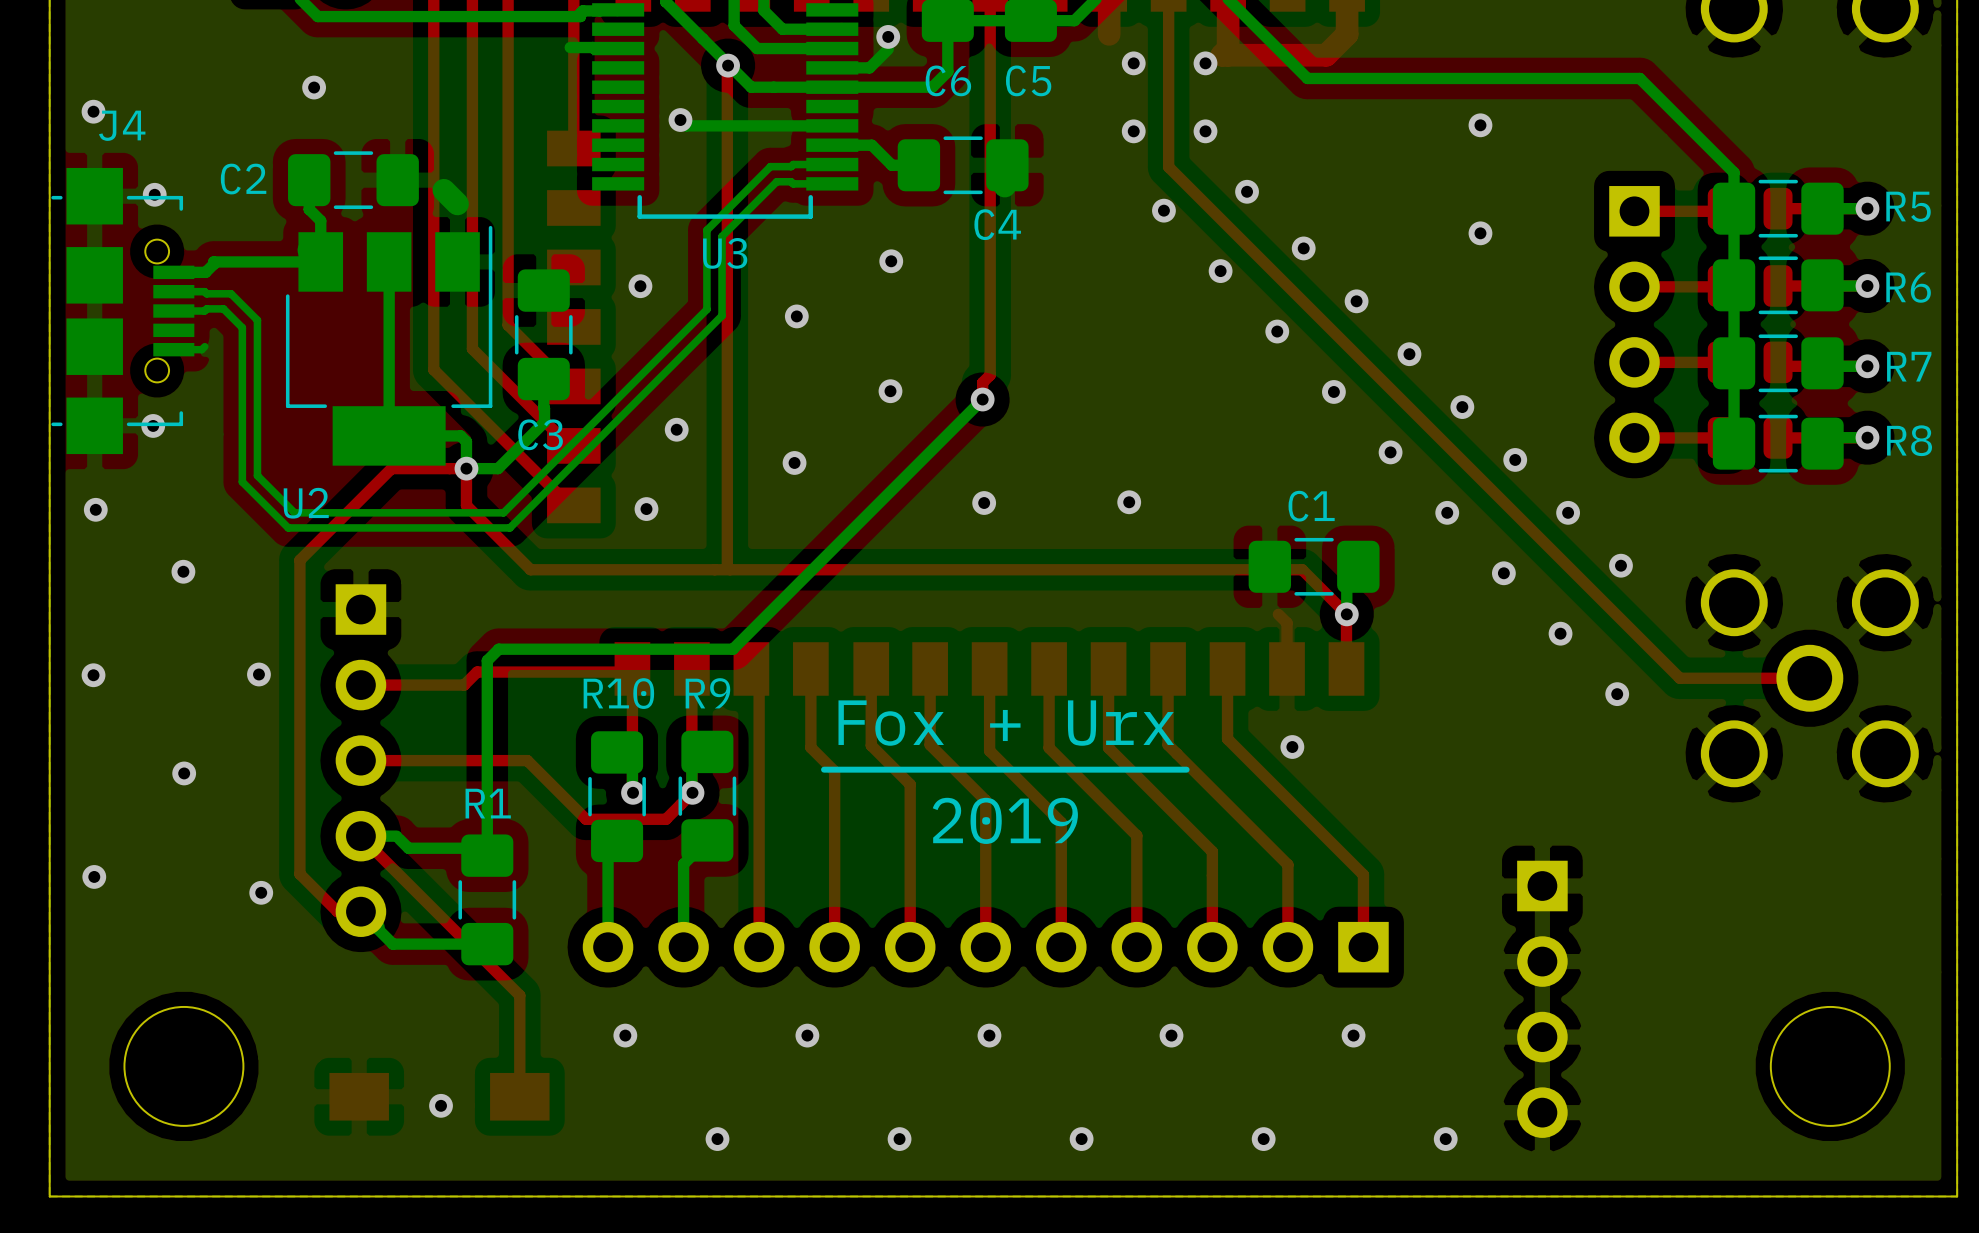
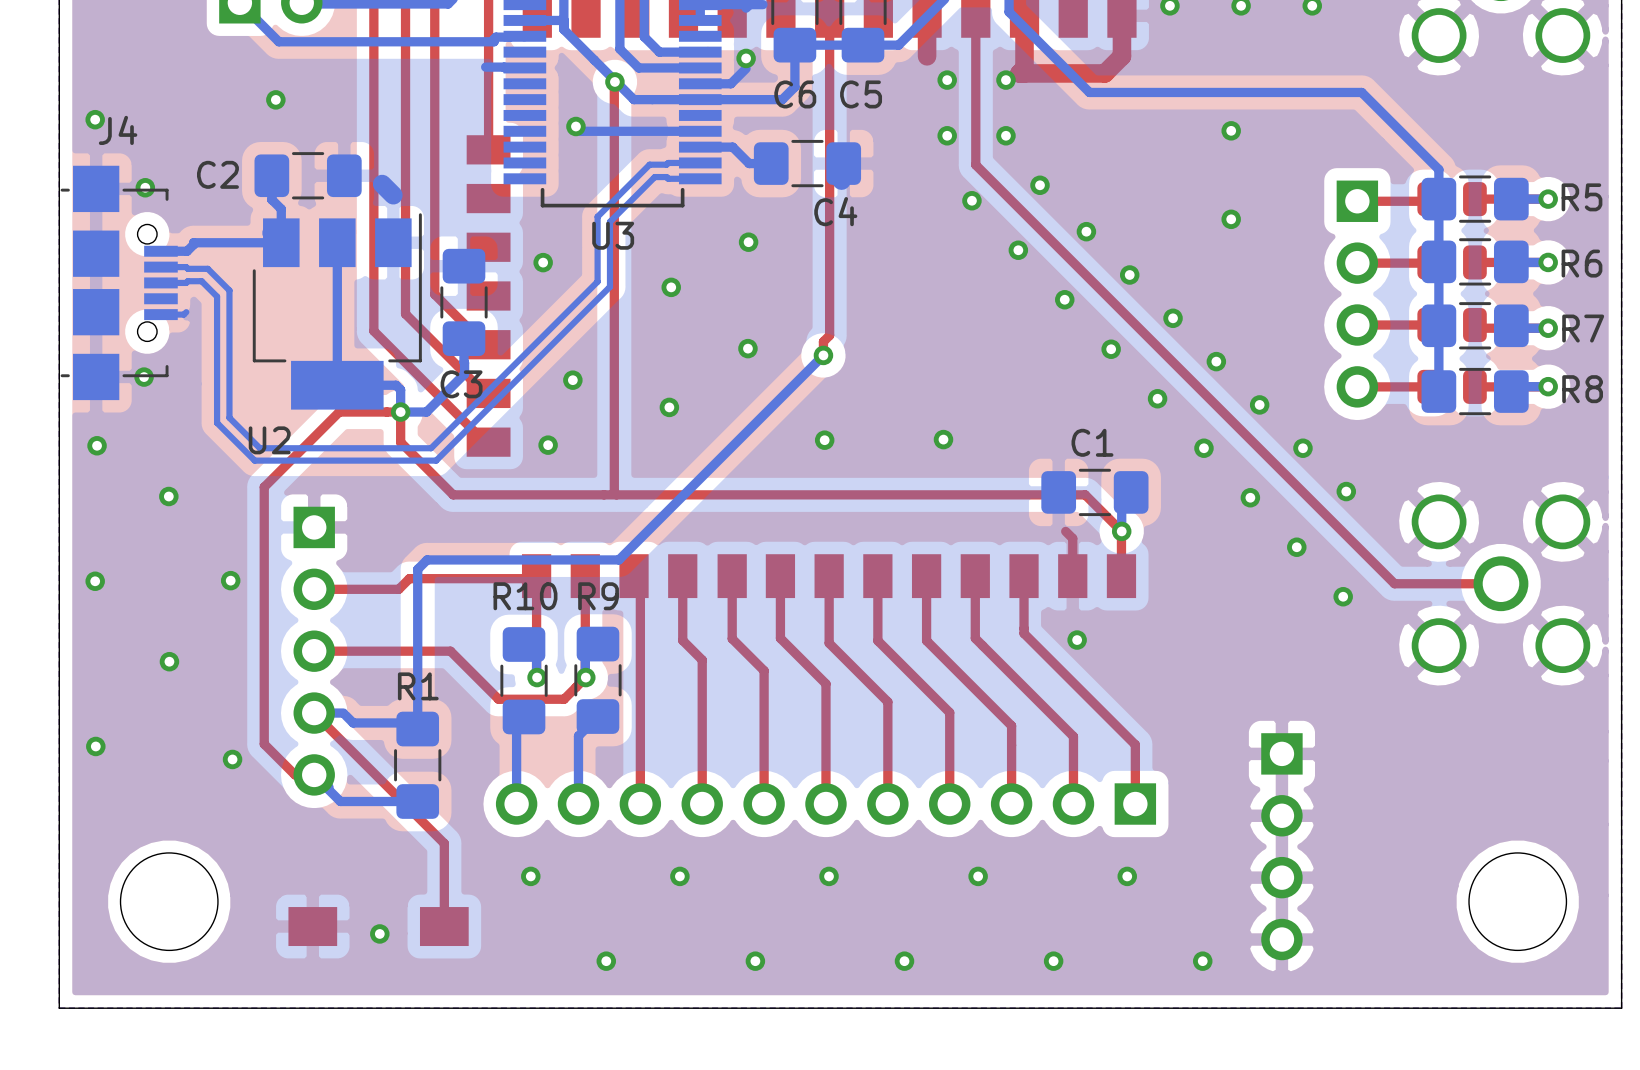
text: Fox + Urx (1006, 723) -> none
line: (1186, 769) (824, 769) -> none
text: 2019 (1005, 820) -> none

